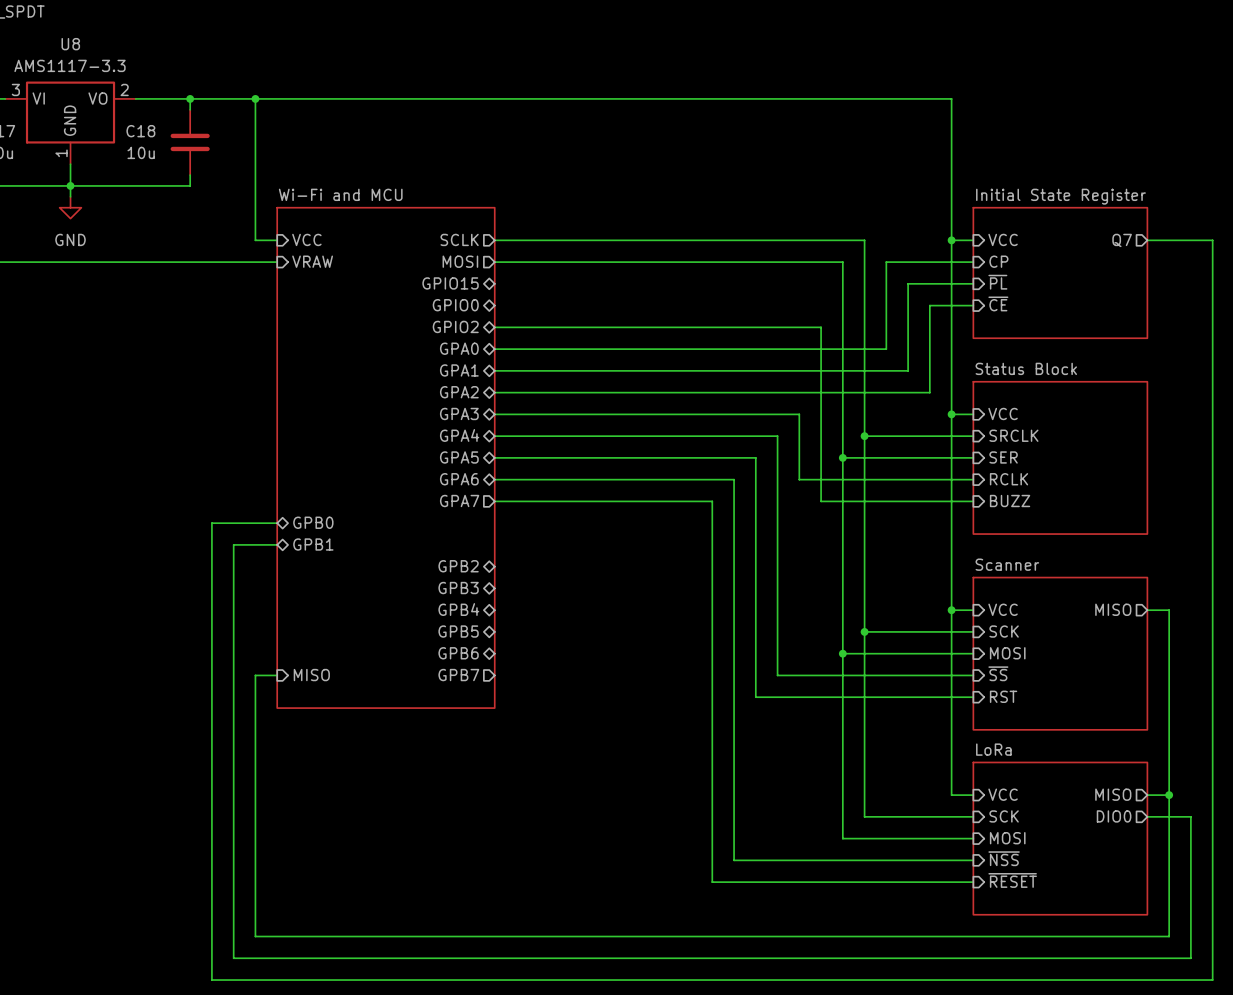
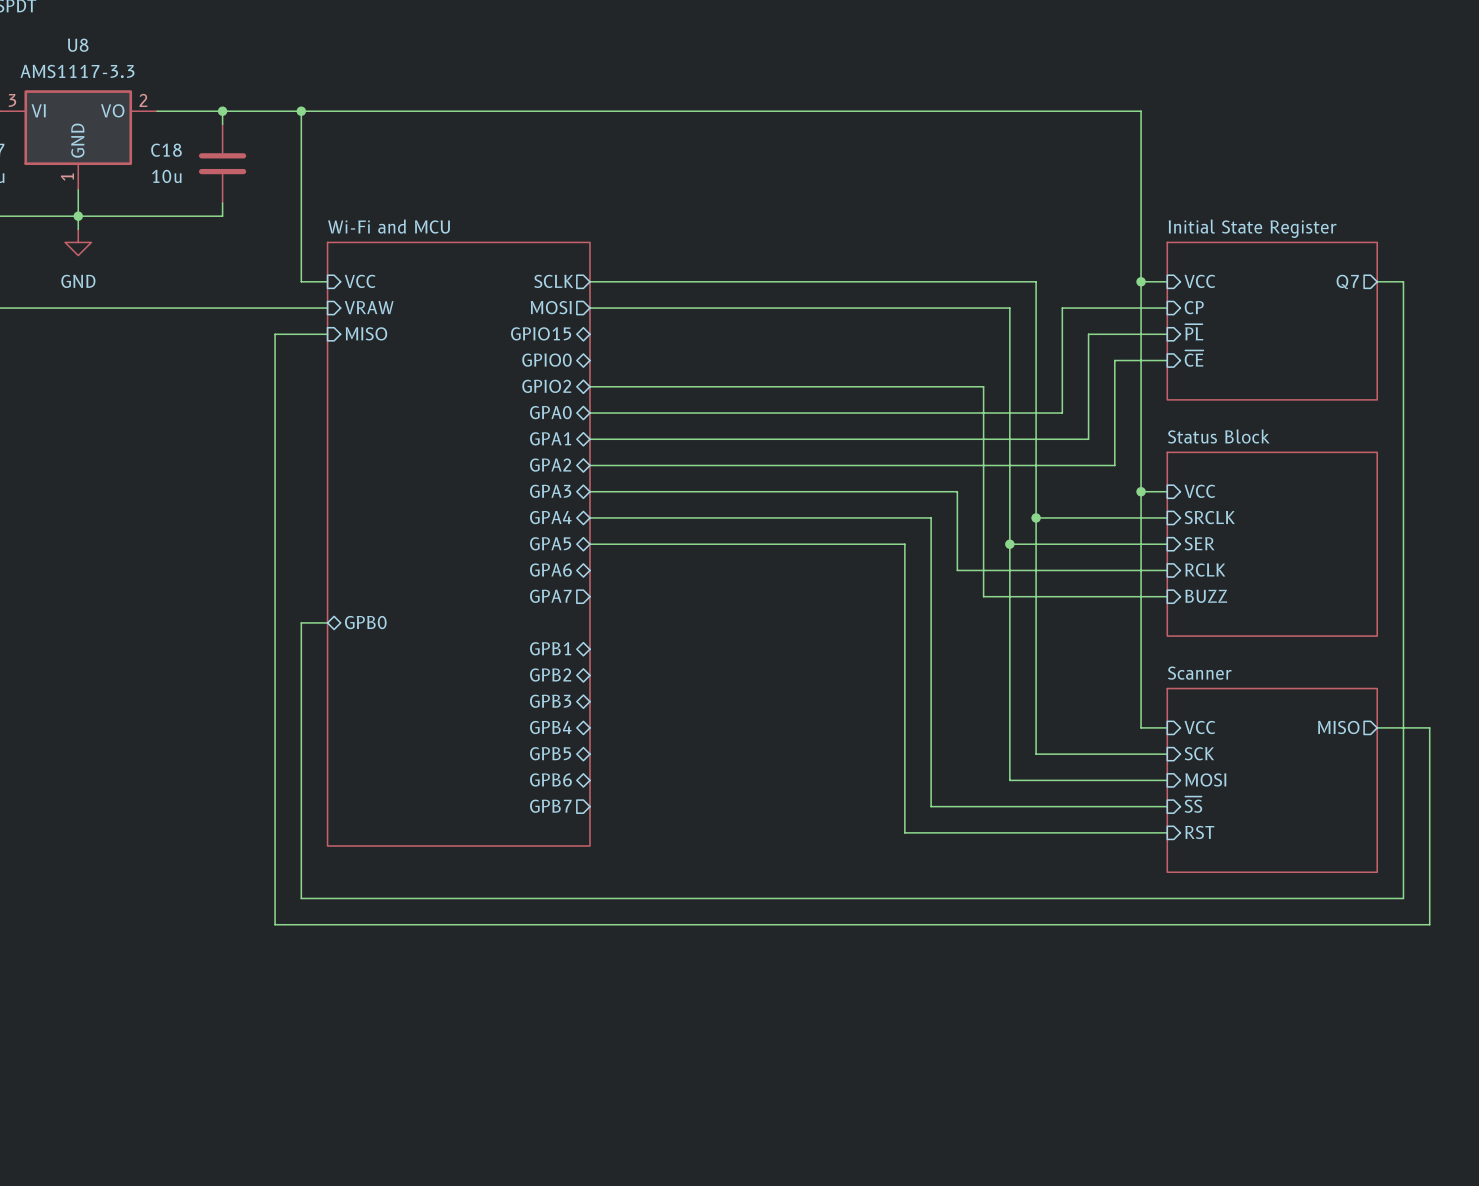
wire: (1169, 240) (1212, 240) (1212, 980) (211, 980) (211, 523) (255, 523) -> (1403, 281) (1403, 727) (1429, 727) (1429, 924) (275, 924)
sheet pin: none -> MISO (366, 333)
wire: (494, 479) (734, 479) (734, 860) (973, 860) -> none
wire: (494, 501) (712, 501) (712, 882) (973, 882) -> none
wire: (233, 544) (277, 544) -> (275, 649) (275, 334) (327, 334)
sheet pin rotation: 0° (313, 544) -> 180° (550, 648)
sheet pin position: GPB1 (313, 544) -> GPB1 (550, 648)
wire: (951, 610) (951, 795) (973, 795) -> none
junction: (951, 610) -> none
wire: (864, 631) (864, 816) (973, 816) -> none
junction: (864, 631) -> none
wire: (842, 653) (842, 838) (973, 838) -> none
junction: (842, 653) -> none
wire: (255, 675) (277, 675) -> (301, 806) (301, 622)
sheet pin: MISO (311, 675) -> none
wire: (255, 751) (255, 936) (1169, 936) (1169, 751) -> (301, 898) (1403, 898)
wire: (233, 773) (233, 958) (1190, 958) (1190, 816) (1147, 816) -> none
sheet pin: VCC (1003, 794) -> none
sheet pin: MISO (1113, 794) -> none
wire: (1147, 795) (1169, 795) -> none
junction: (1169, 795) -> none
sheet pin: SCK (1004, 816) -> none
sheet pin: DIO0 (1114, 816) -> none
sheet pin: MOSI (1007, 838) -> none
sheet LoRa: (1060, 838) -> none
sheet pin: ~{NSS} (1004, 858) -> none
sheet pin: ~{RESET} (1012, 880) -> none

